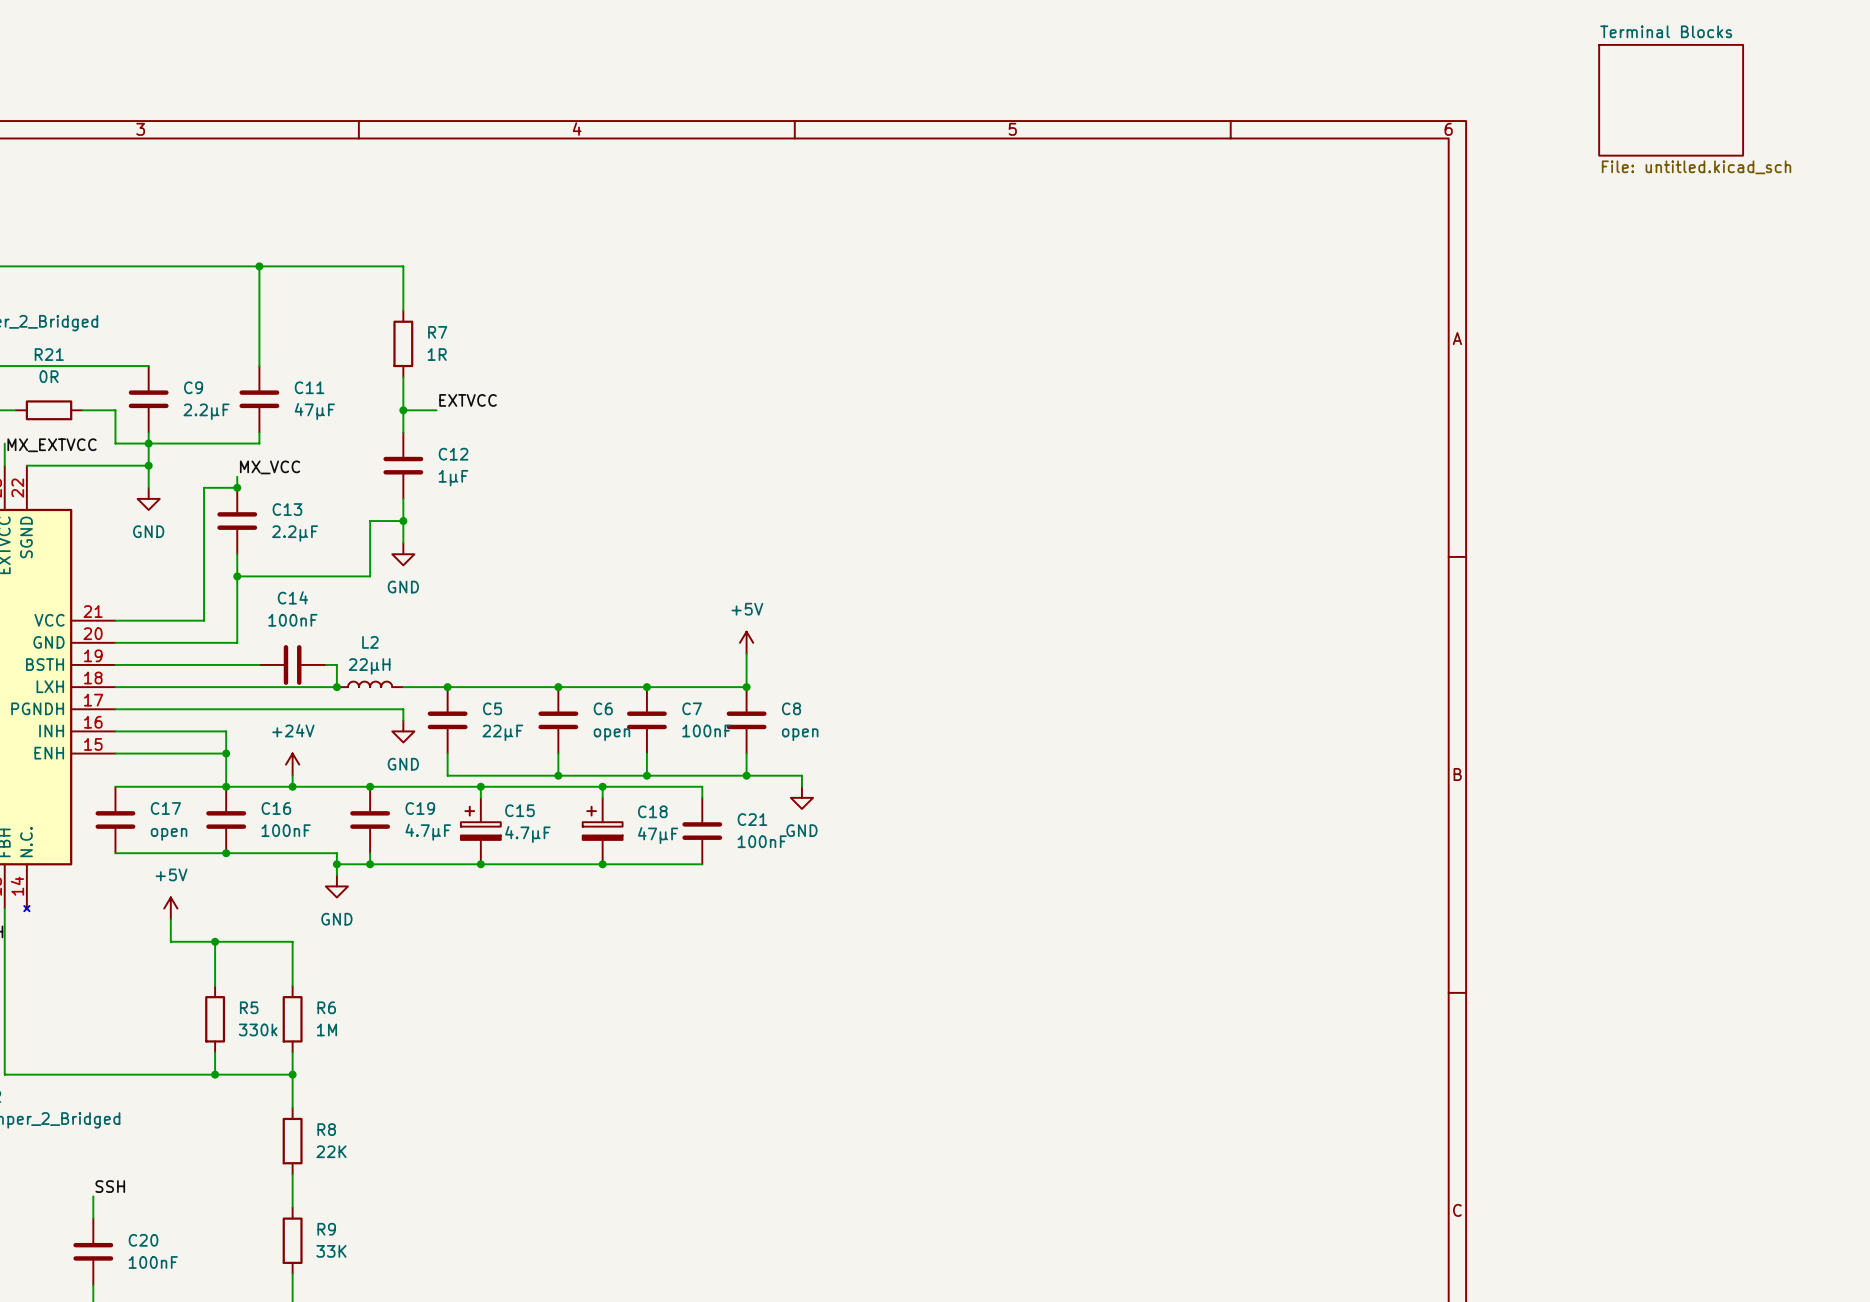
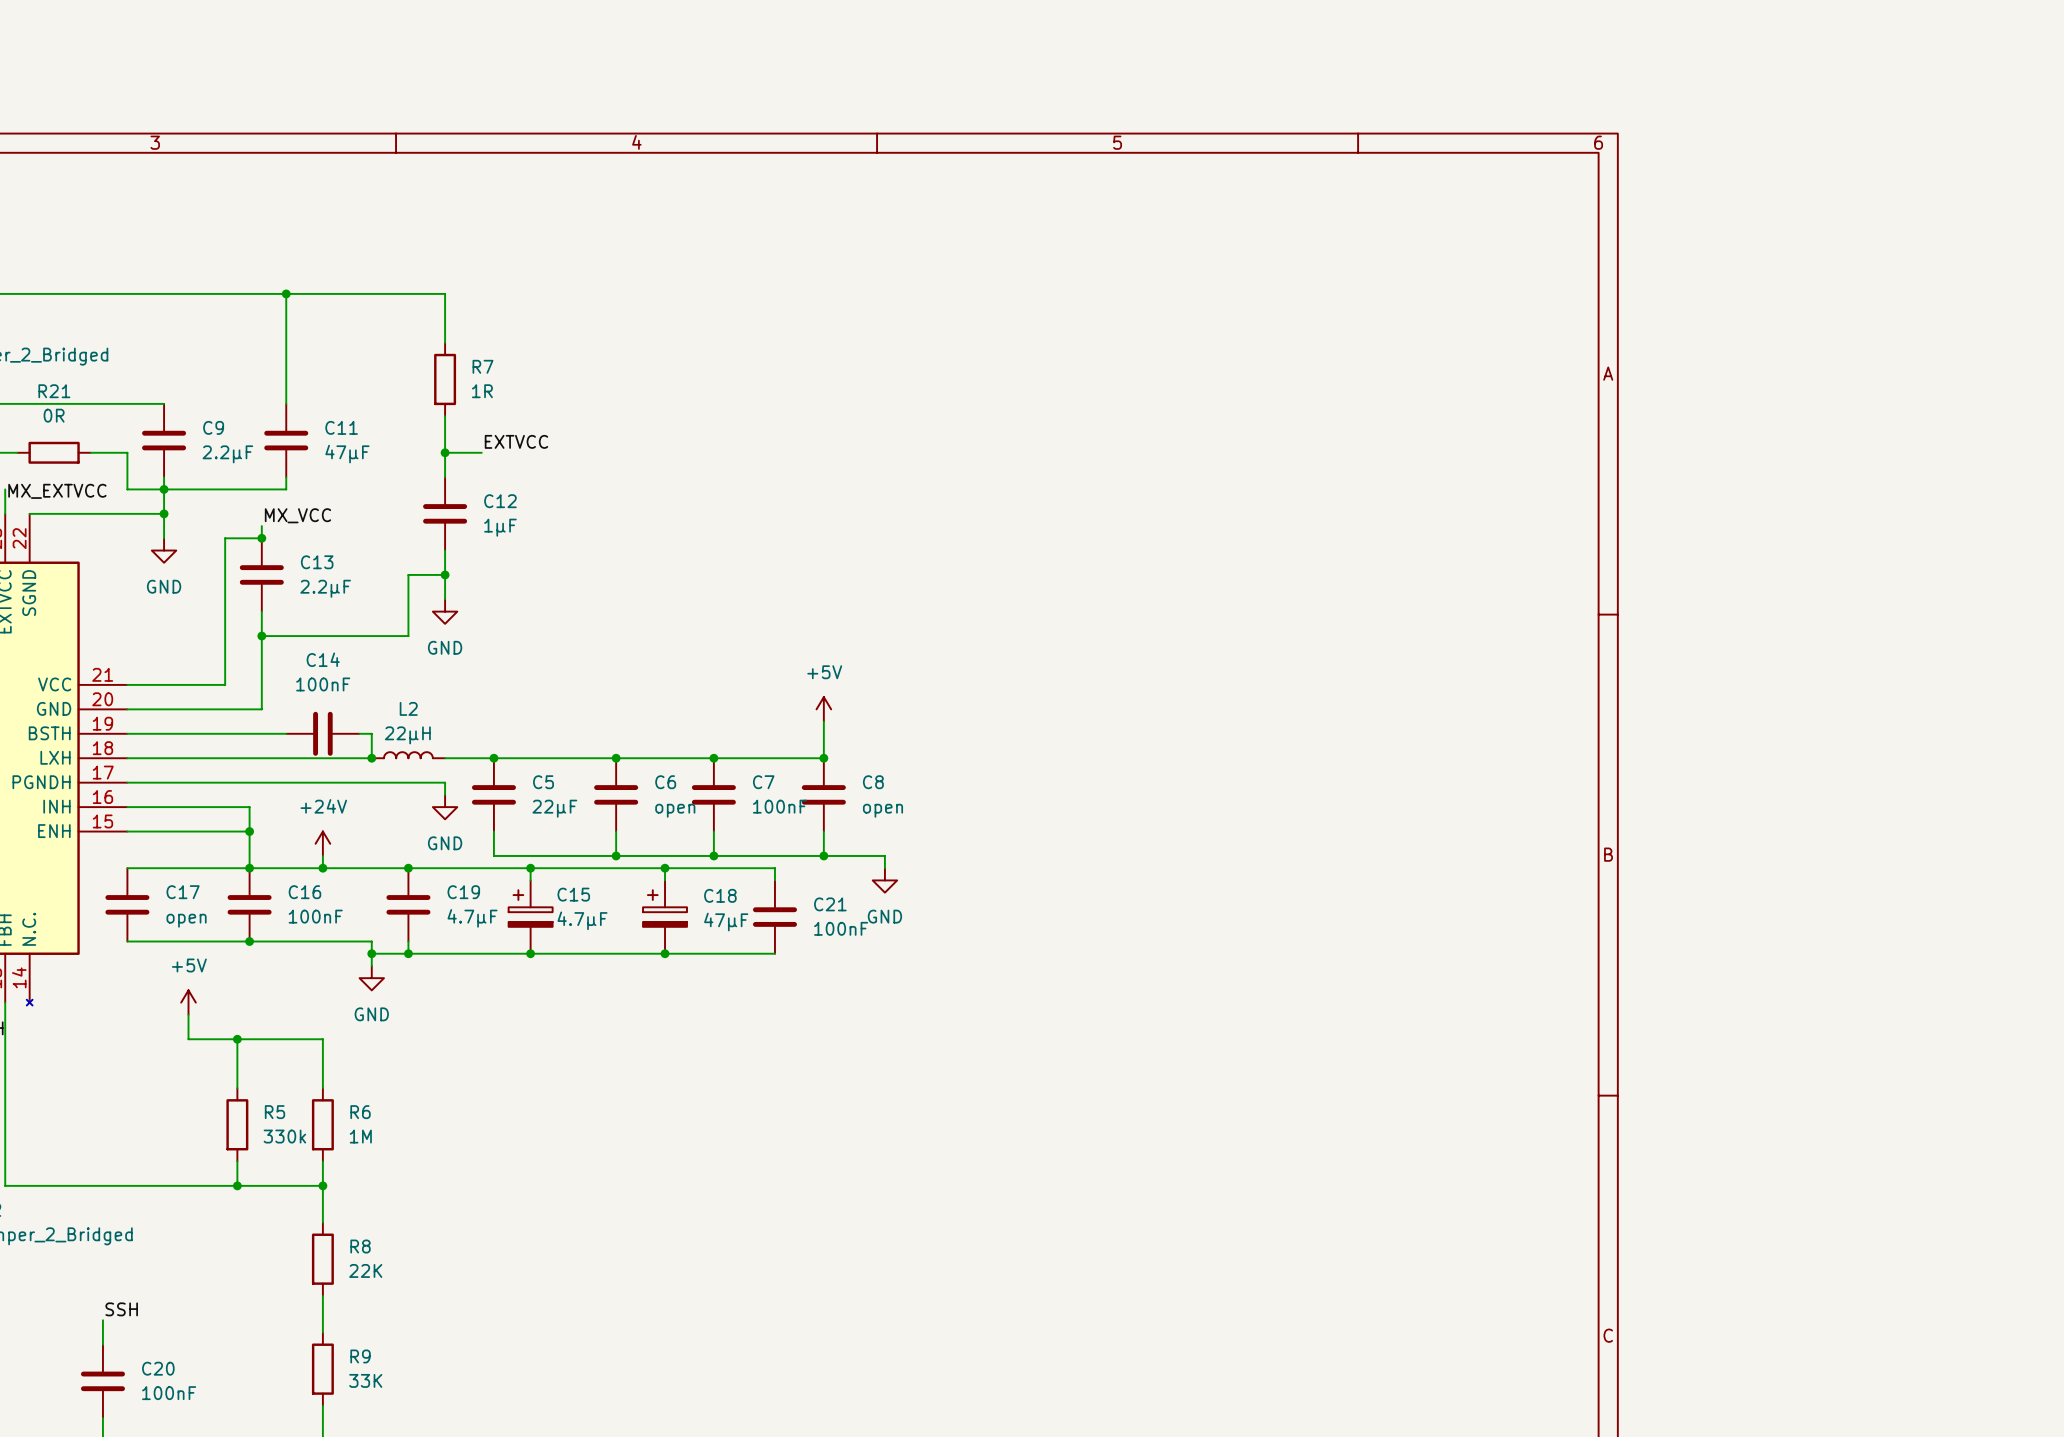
sheet Terminal Blocks: File: untitled.kicad_sch (1671, 100) -> none

